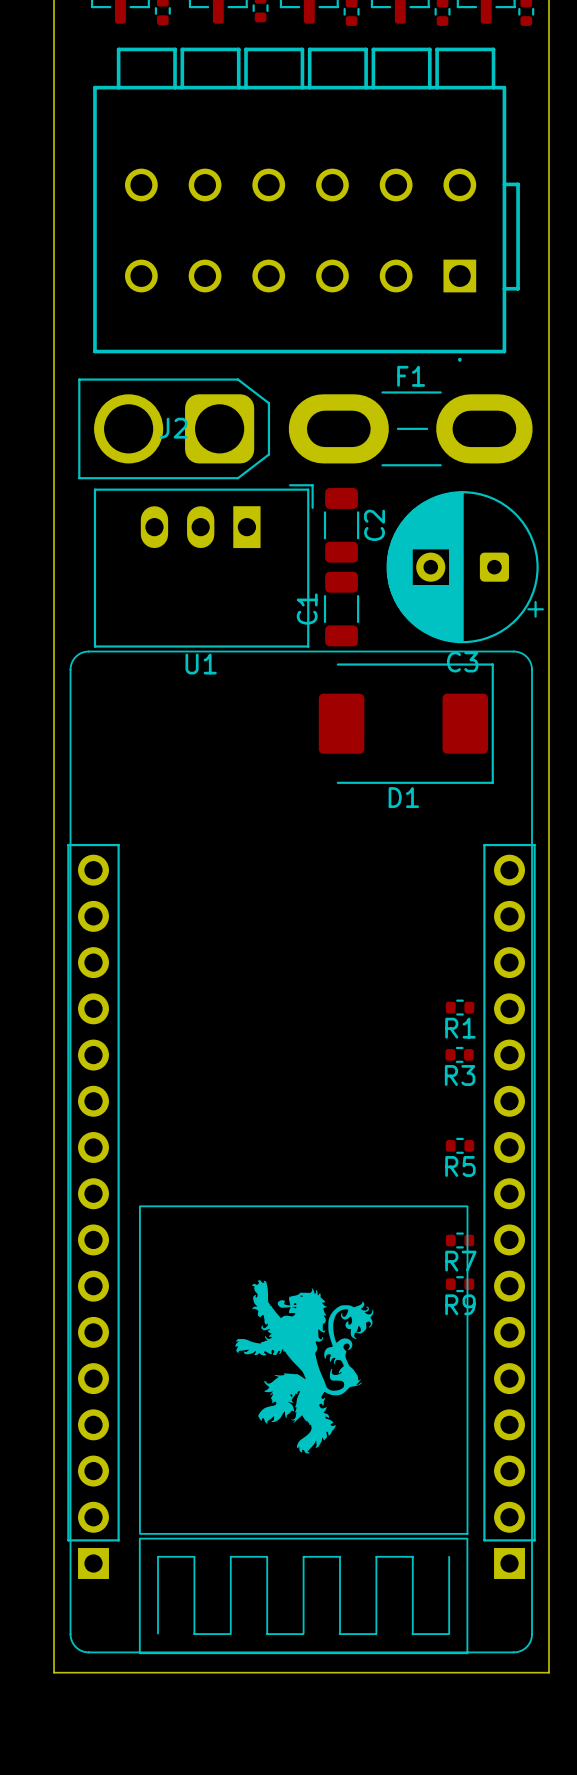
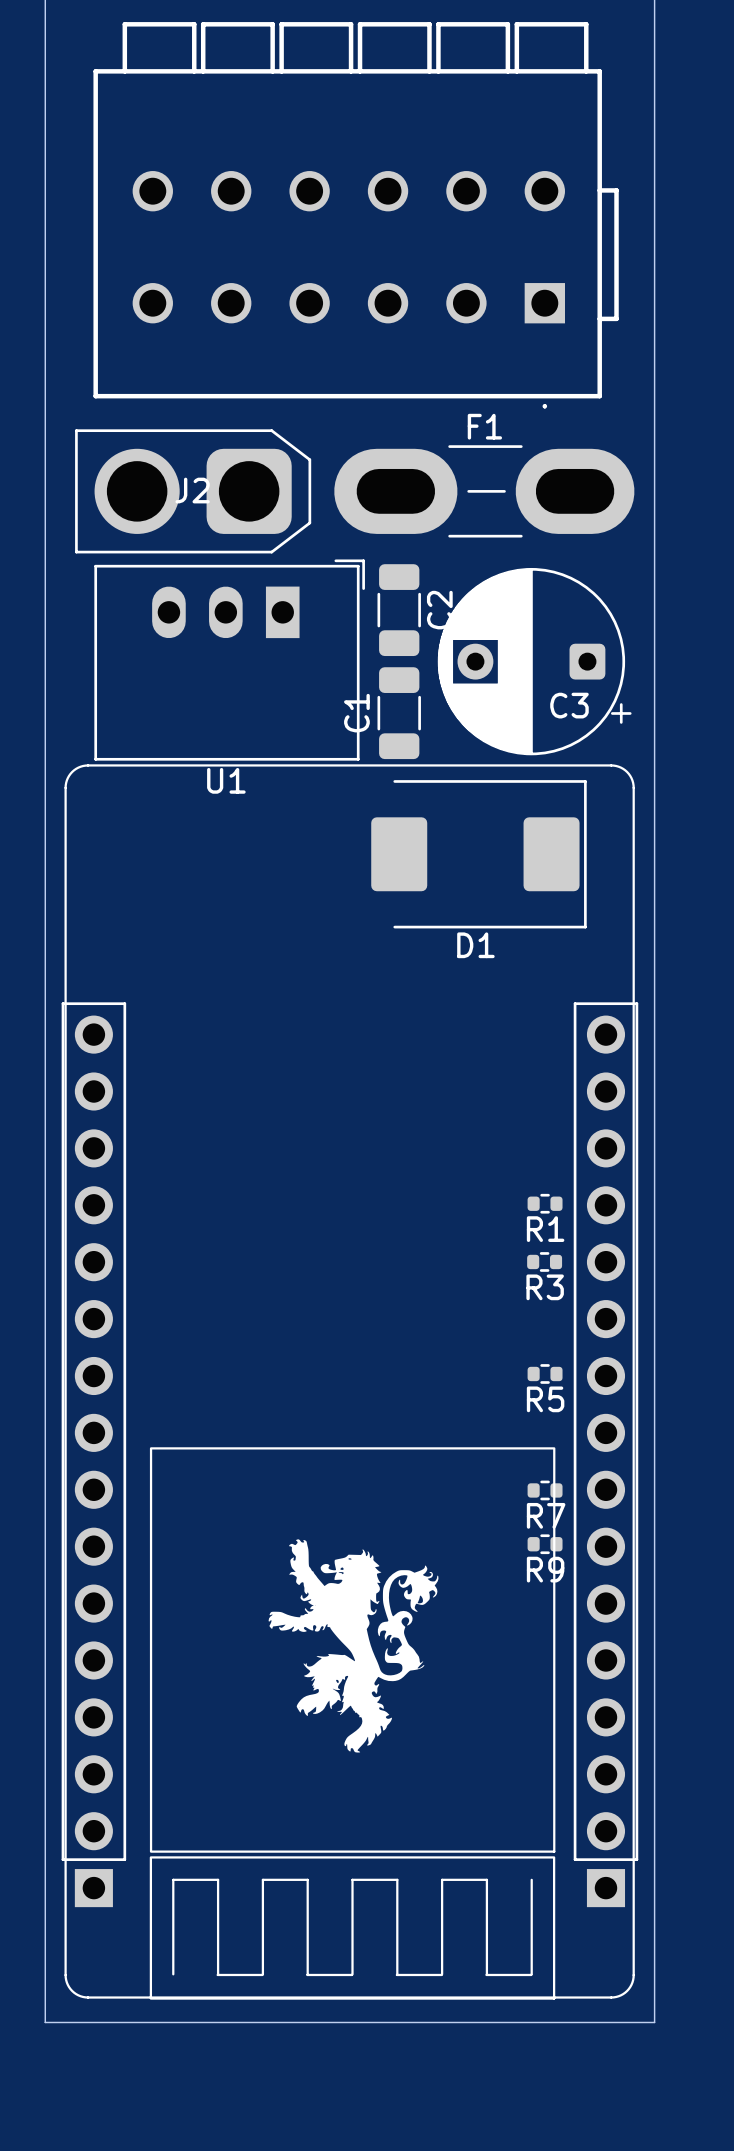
C3 footprint: [386, 491, 544, 644] -> [437, 567, 632, 756]
C3 name position: C3 (462, 662) -> C3 (569, 705)

